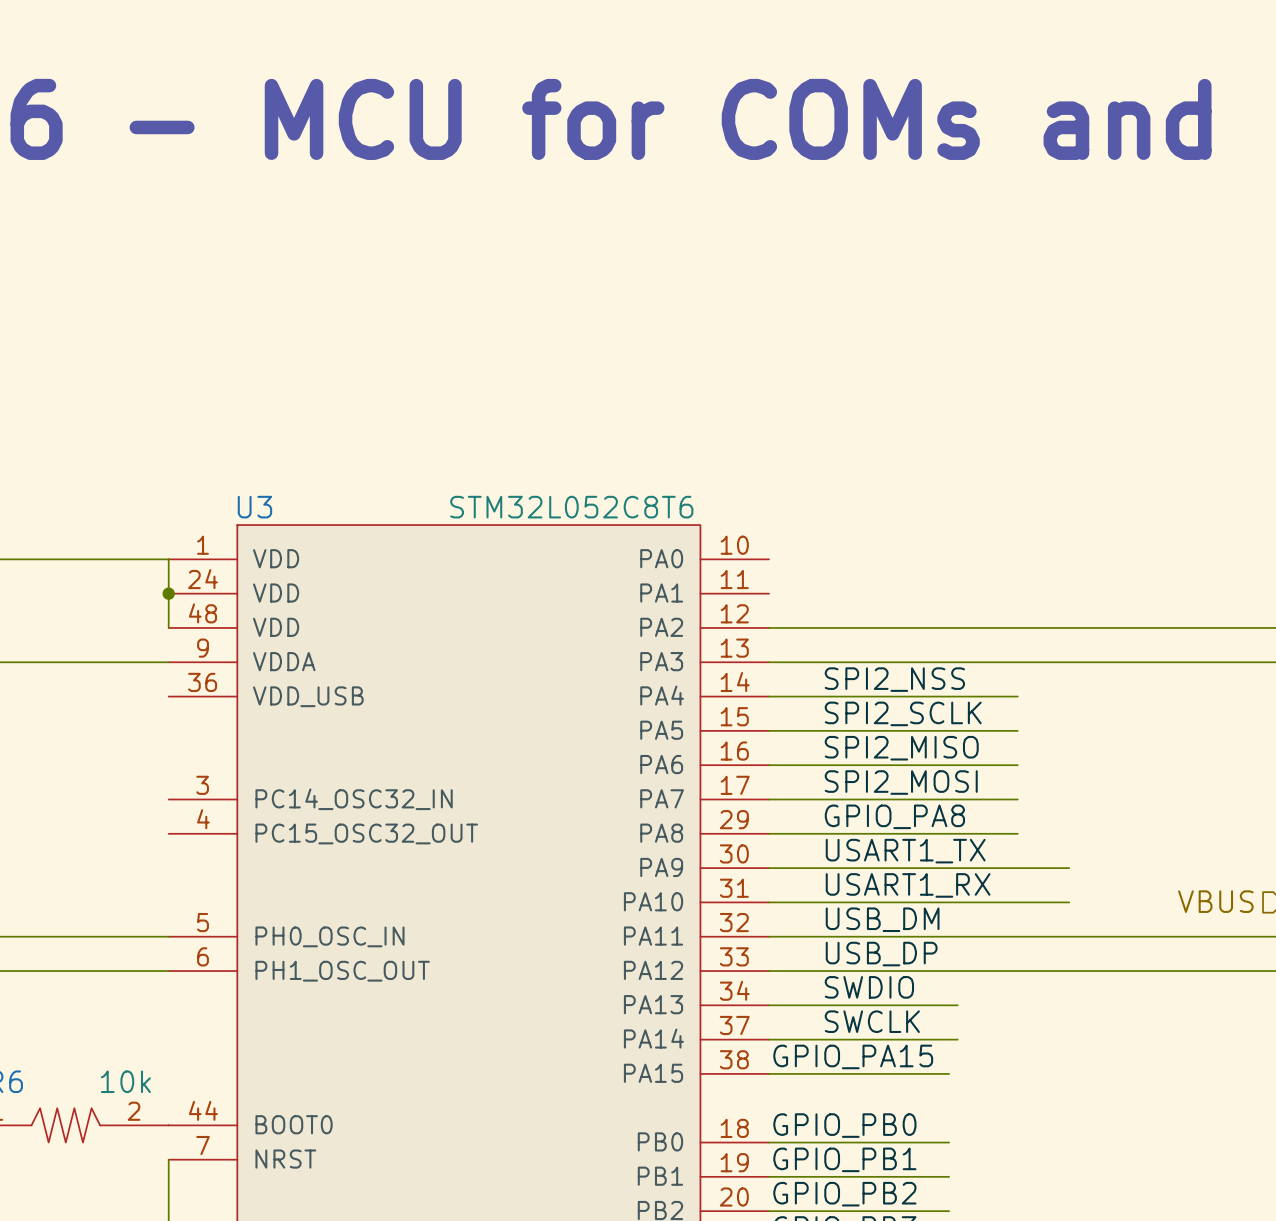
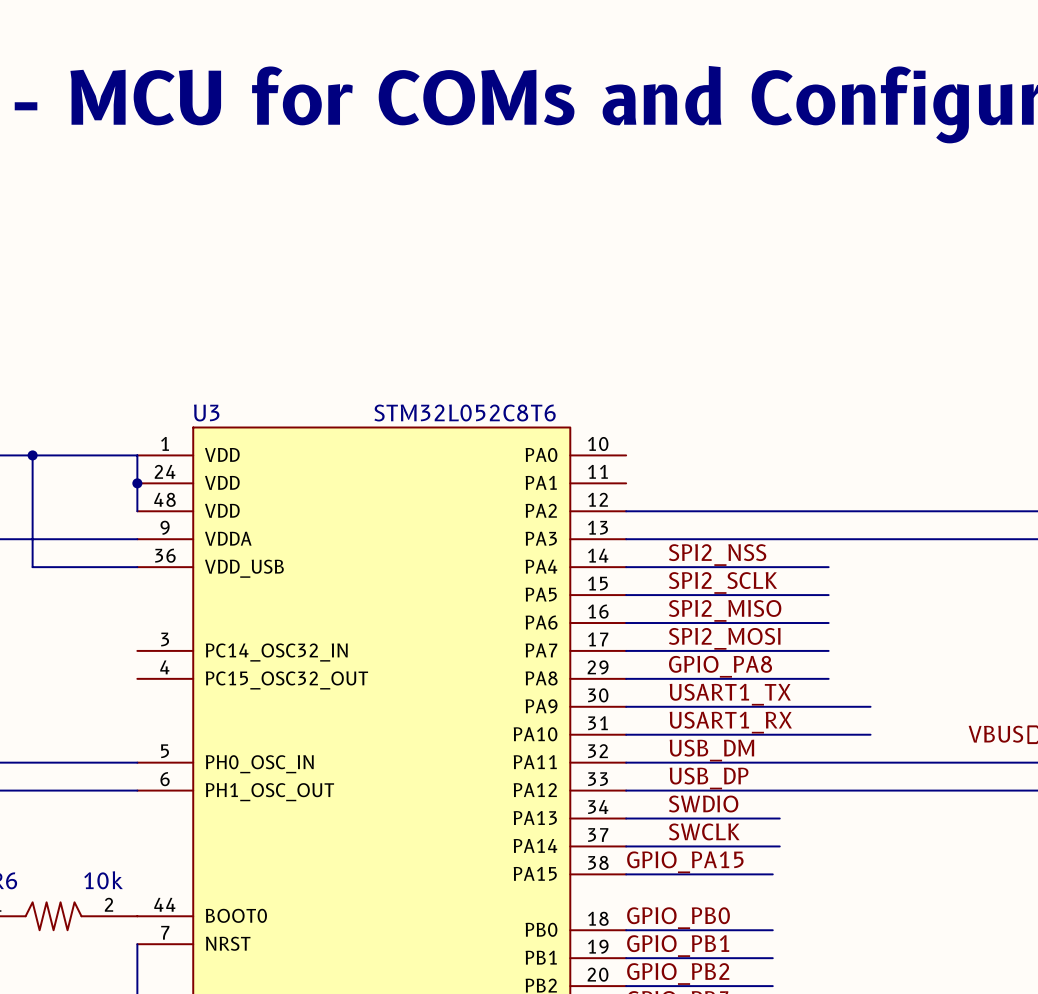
wire: none -> (32, 455) (32, 567) (137, 567)
junction: none -> (32, 455)

